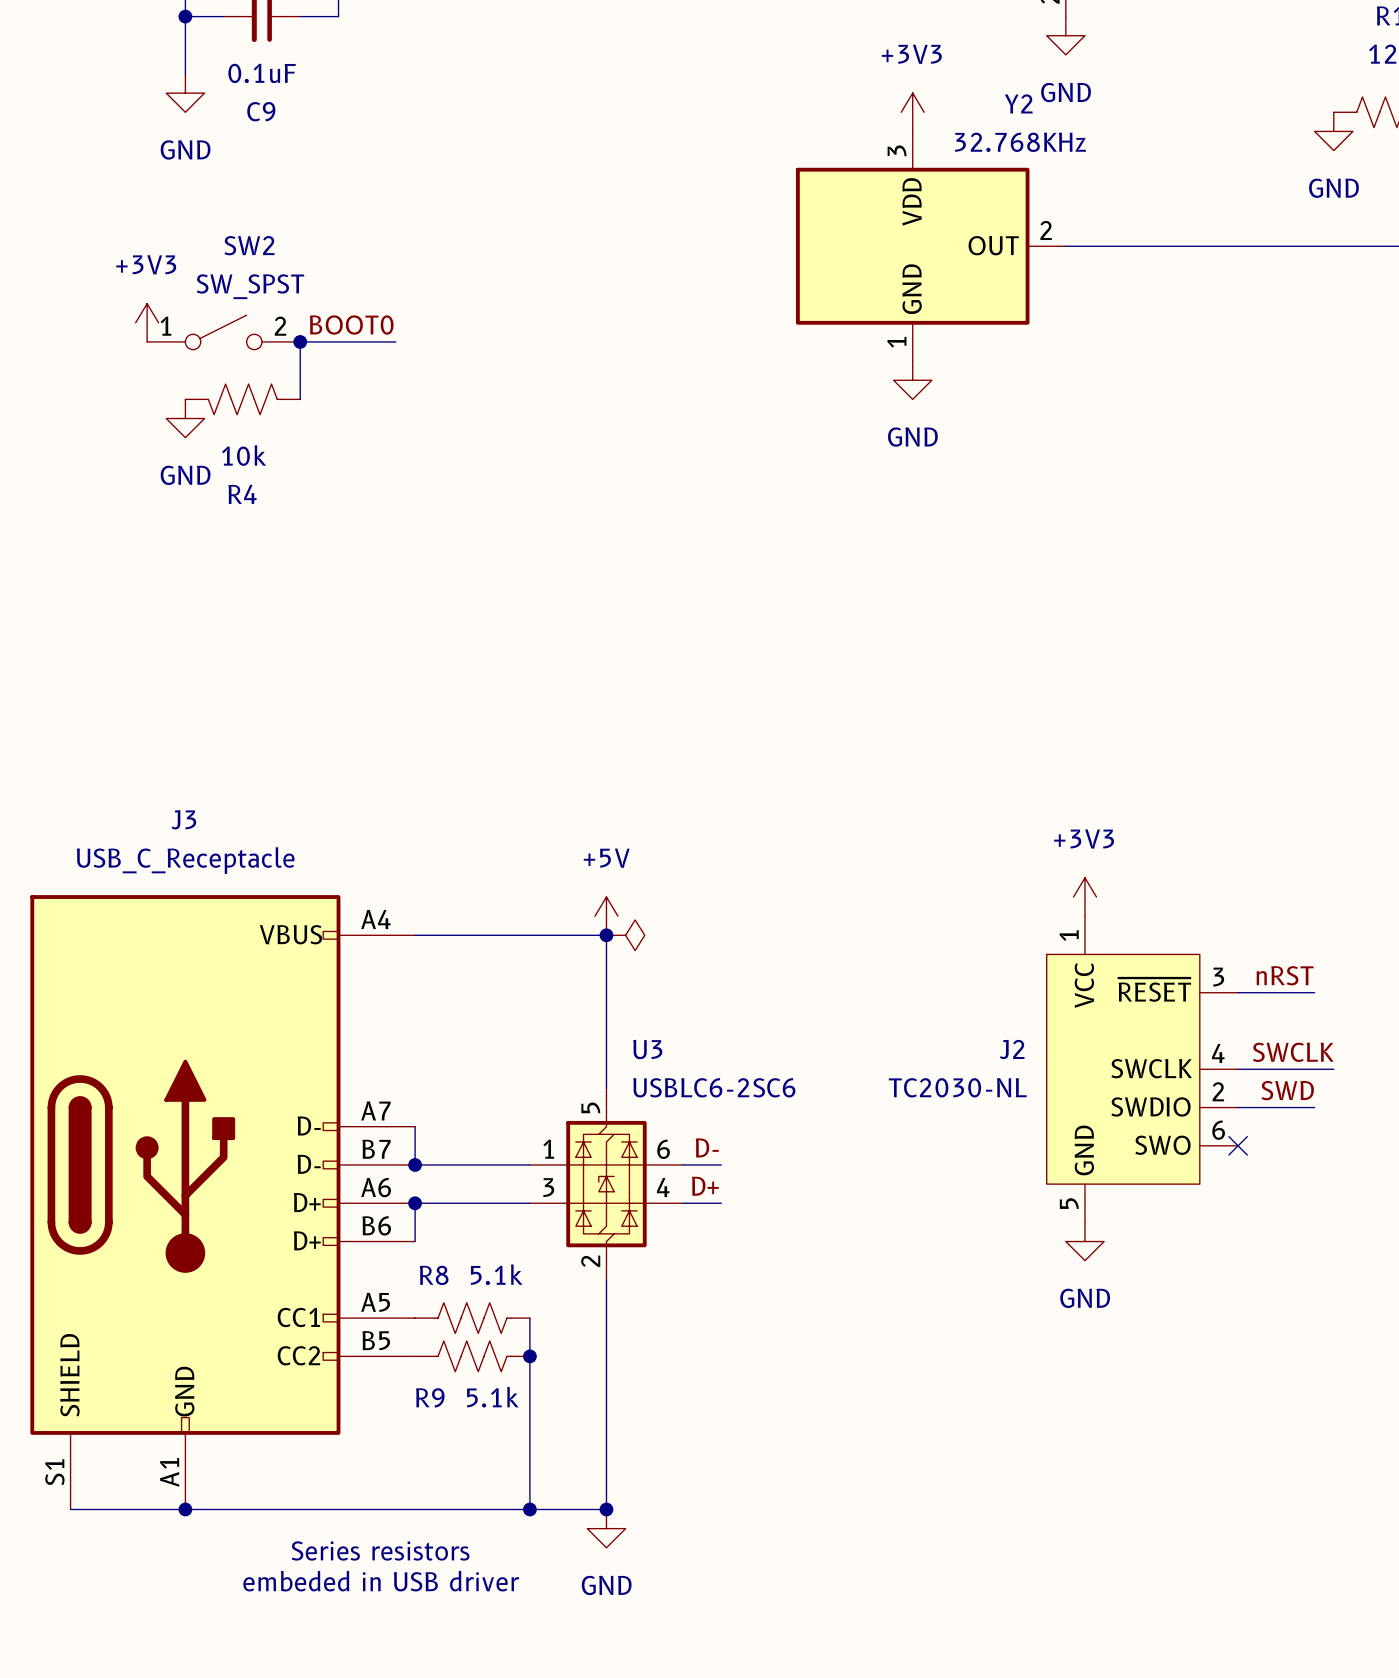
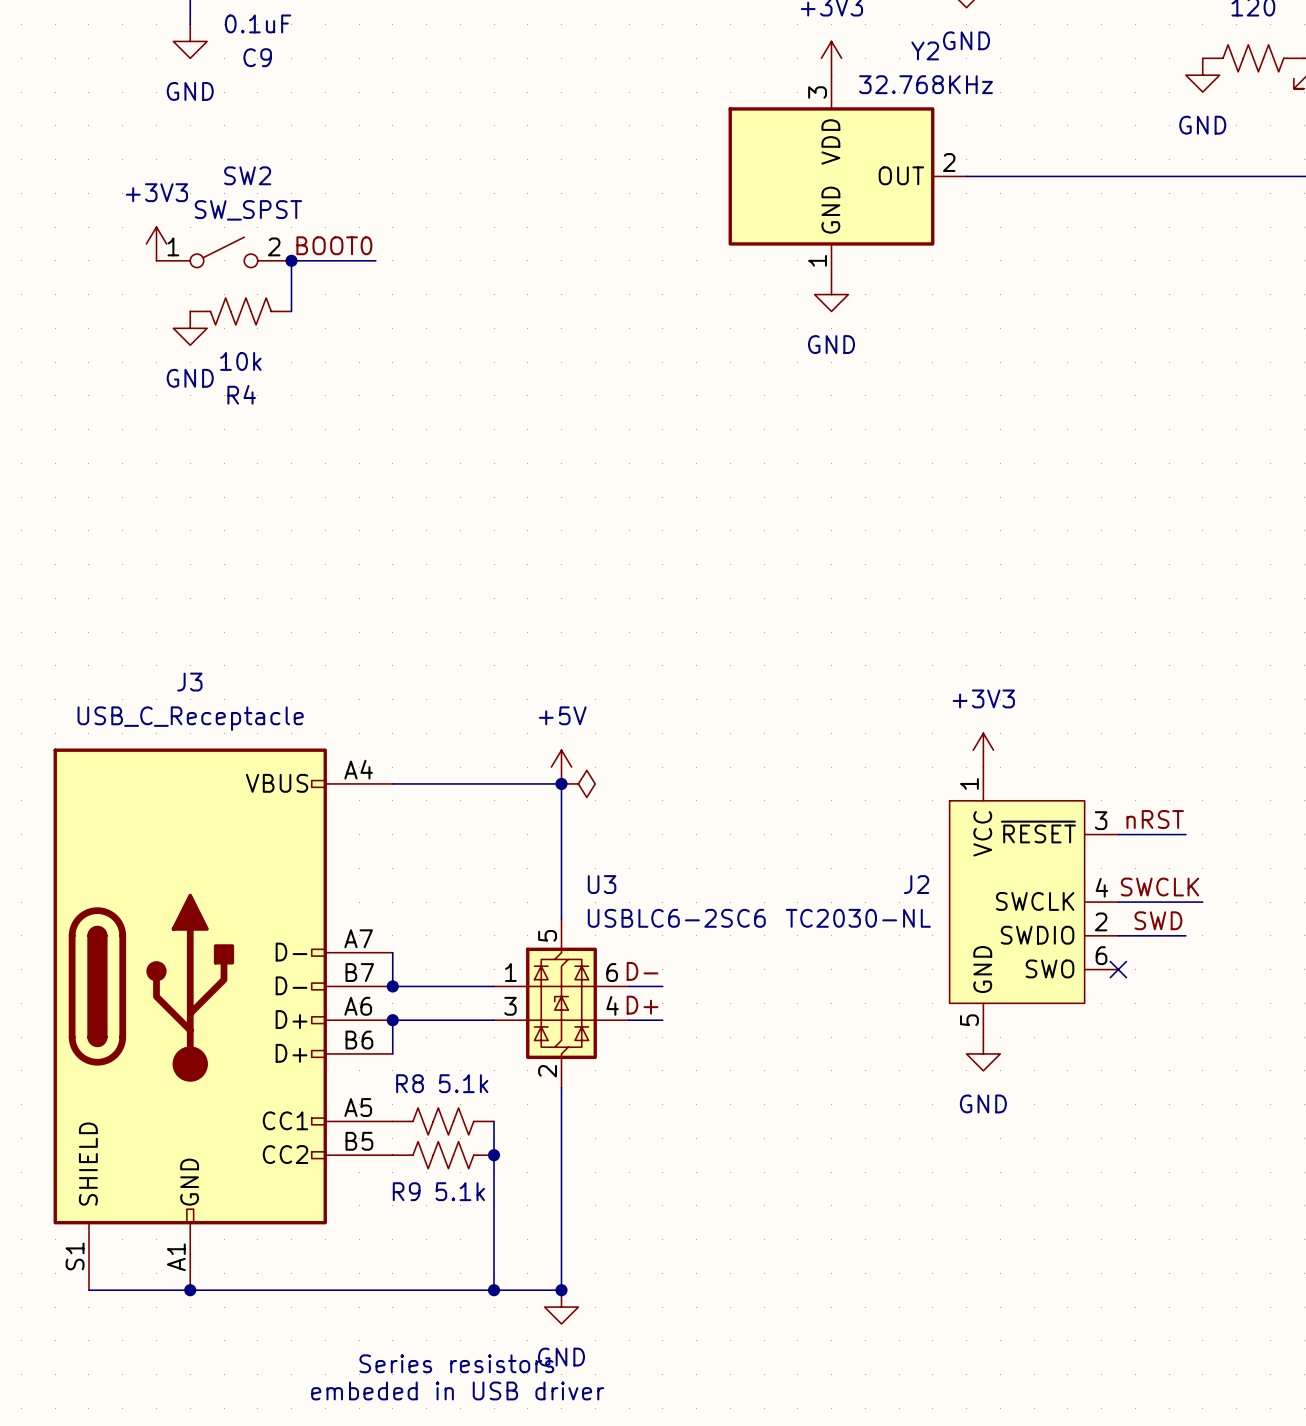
text position: Series resistors (380, 1550) -> Series resistors (456, 1363)
text position: embeded in USB driver (381, 1581) -> embeded in USB driver (457, 1390)

